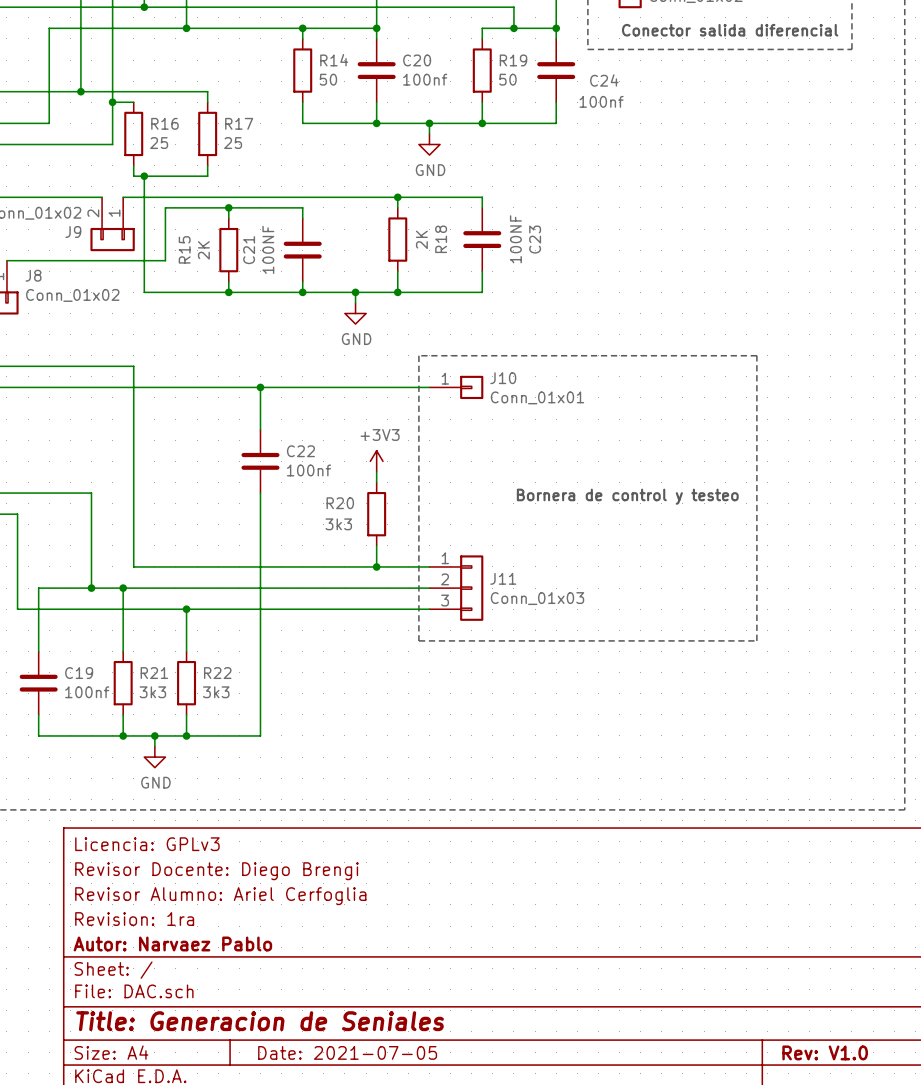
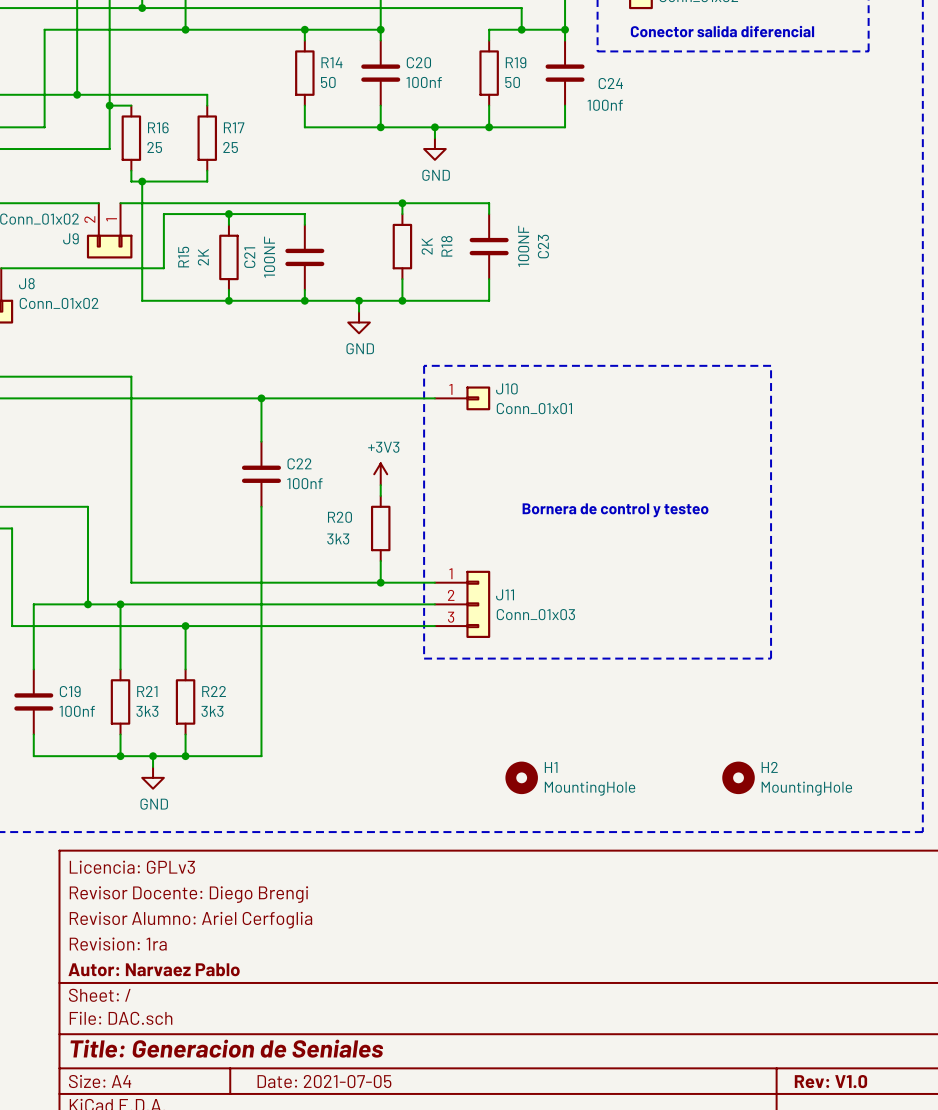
H1: none -> MountingHole (521, 777)
H2: none -> MountingHole (738, 777)

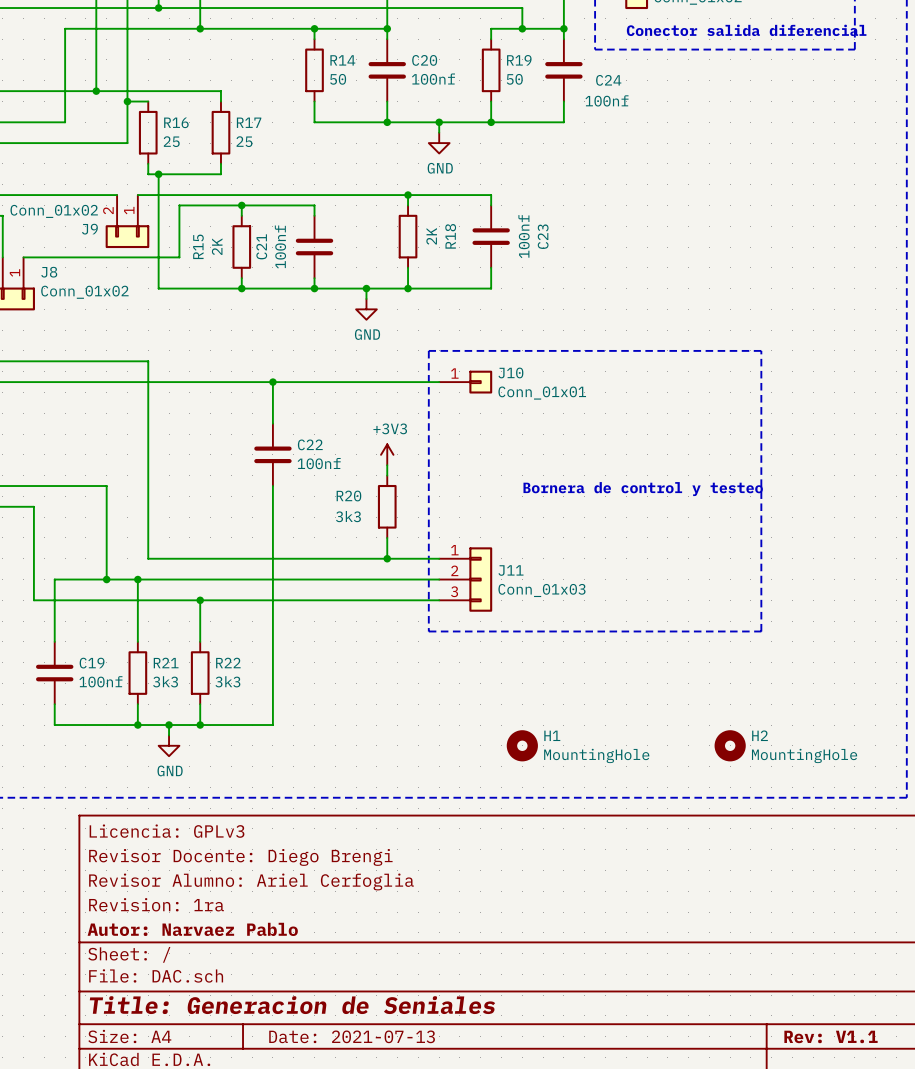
C23 value: 100NF (523, 246) -> 100nf (524, 236)
C21 value: 100NF (269, 257) -> 100nf (280, 247)
title block: Date: 2021-07-05 (324, 1081) -> Date: 2021-07-13 (352, 1036)
title block: Rev: V1.0 (830, 1081) -> Rev: V1.1 (831, 1036)

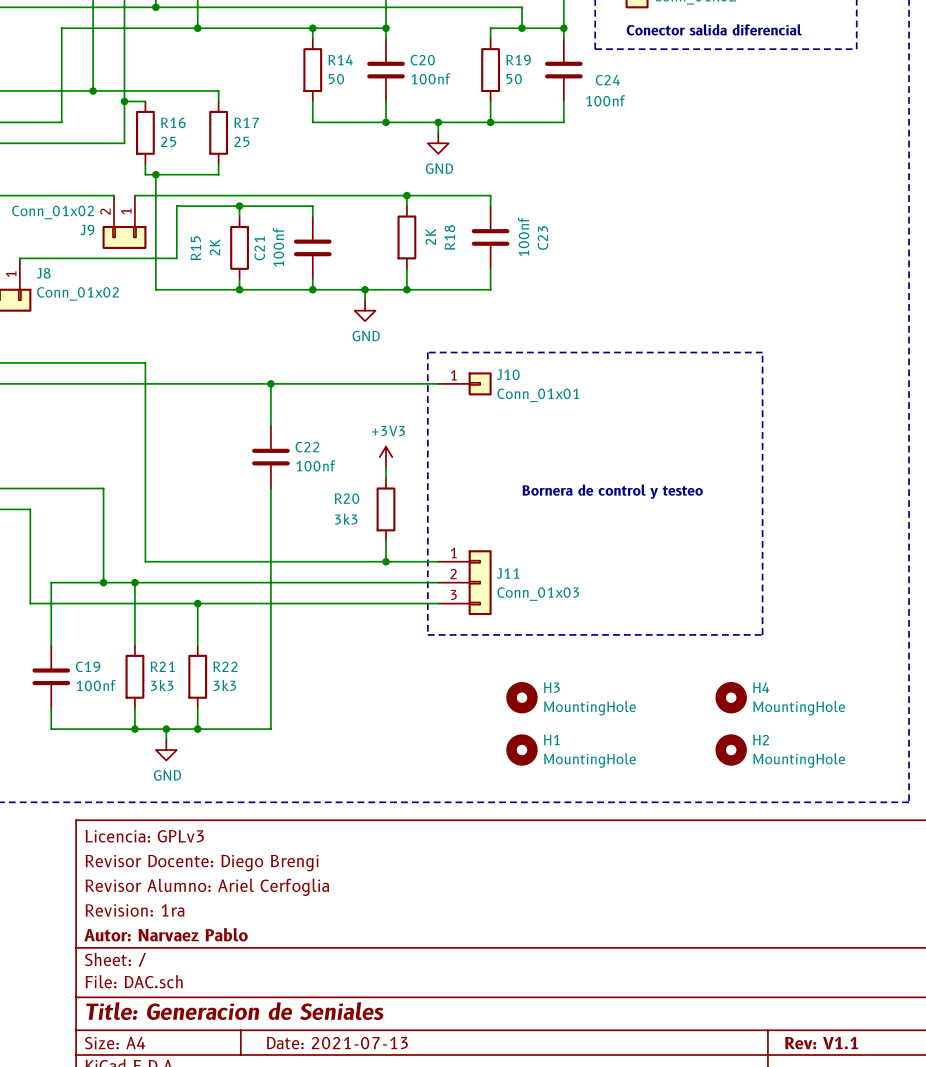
H3: none -> MountingHole (521, 697)
H4: none -> MountingHole (731, 697)

